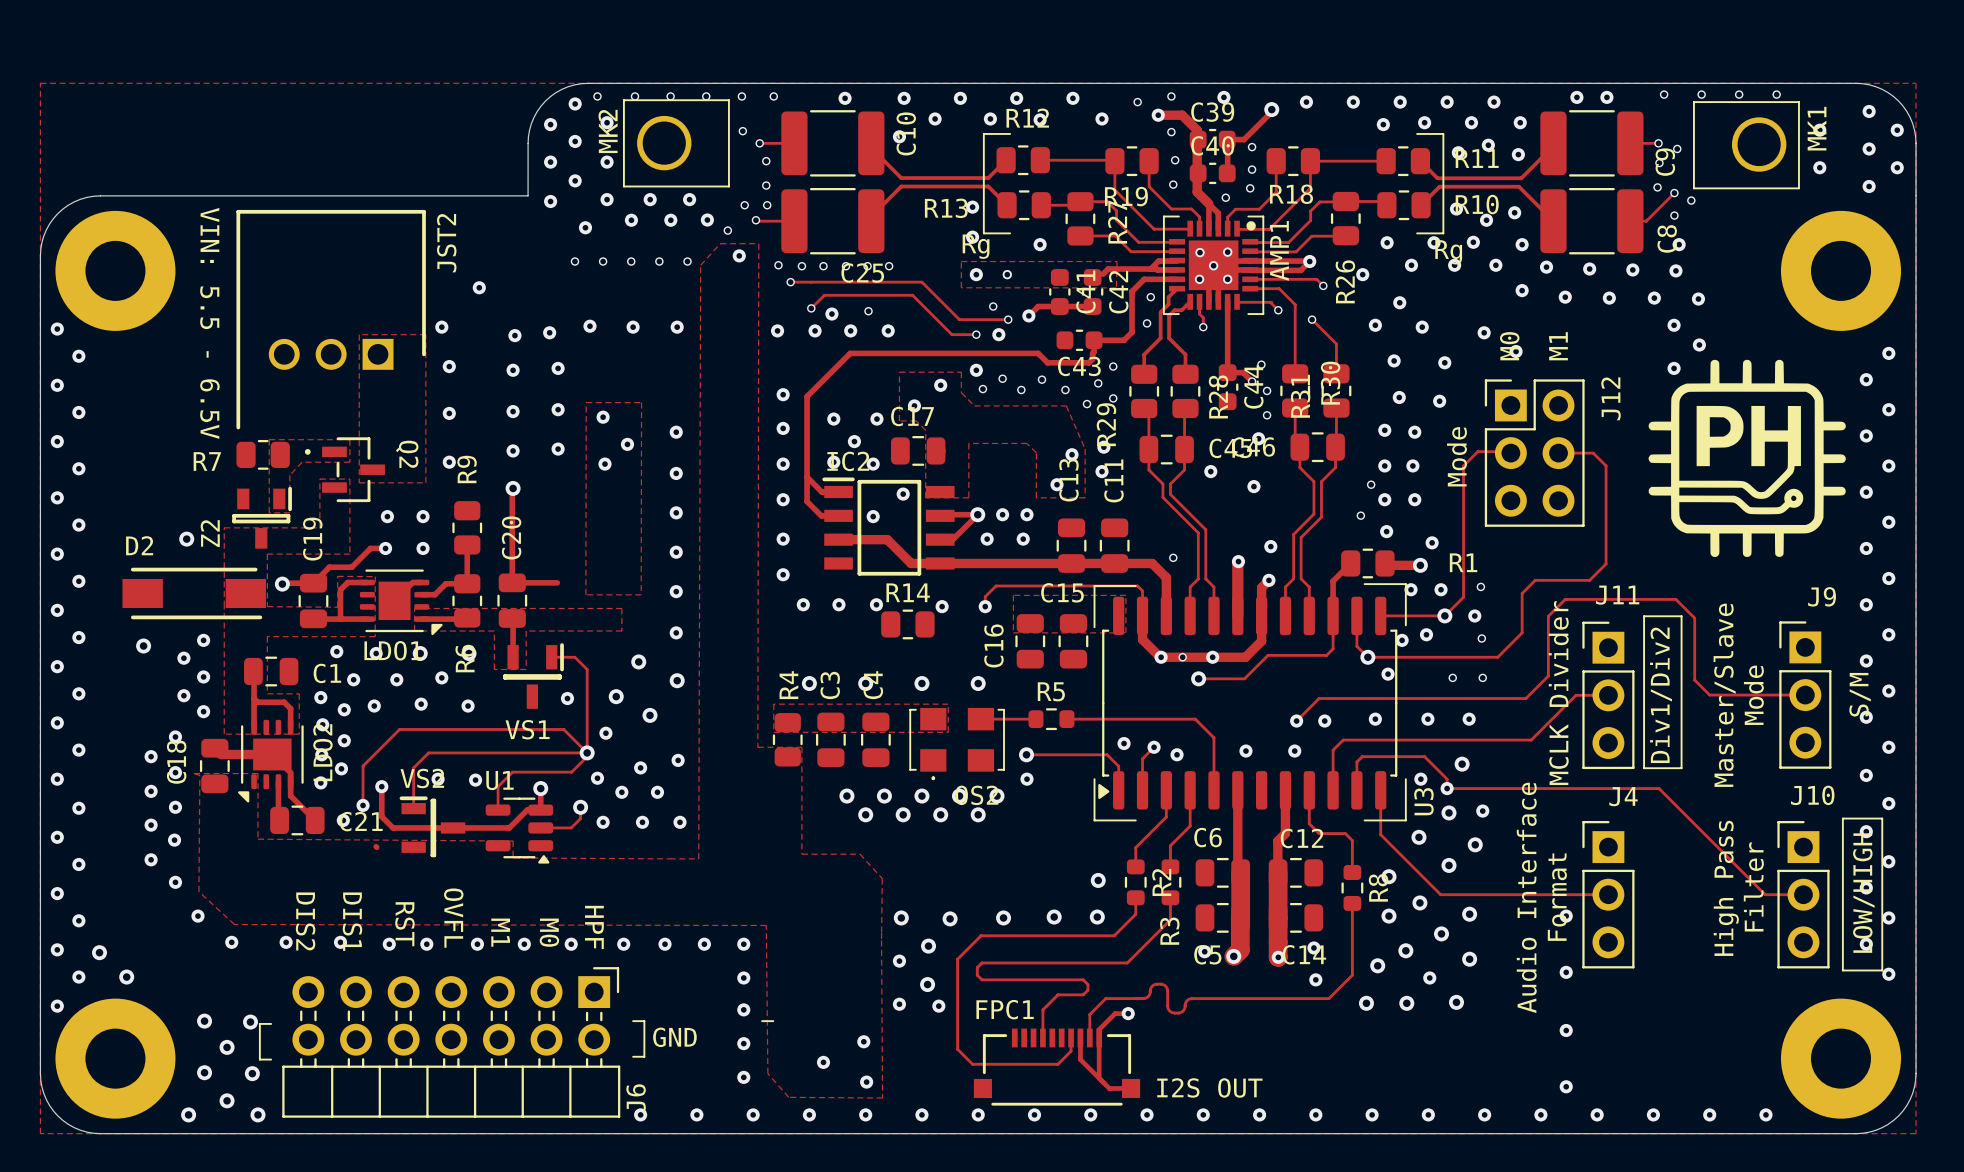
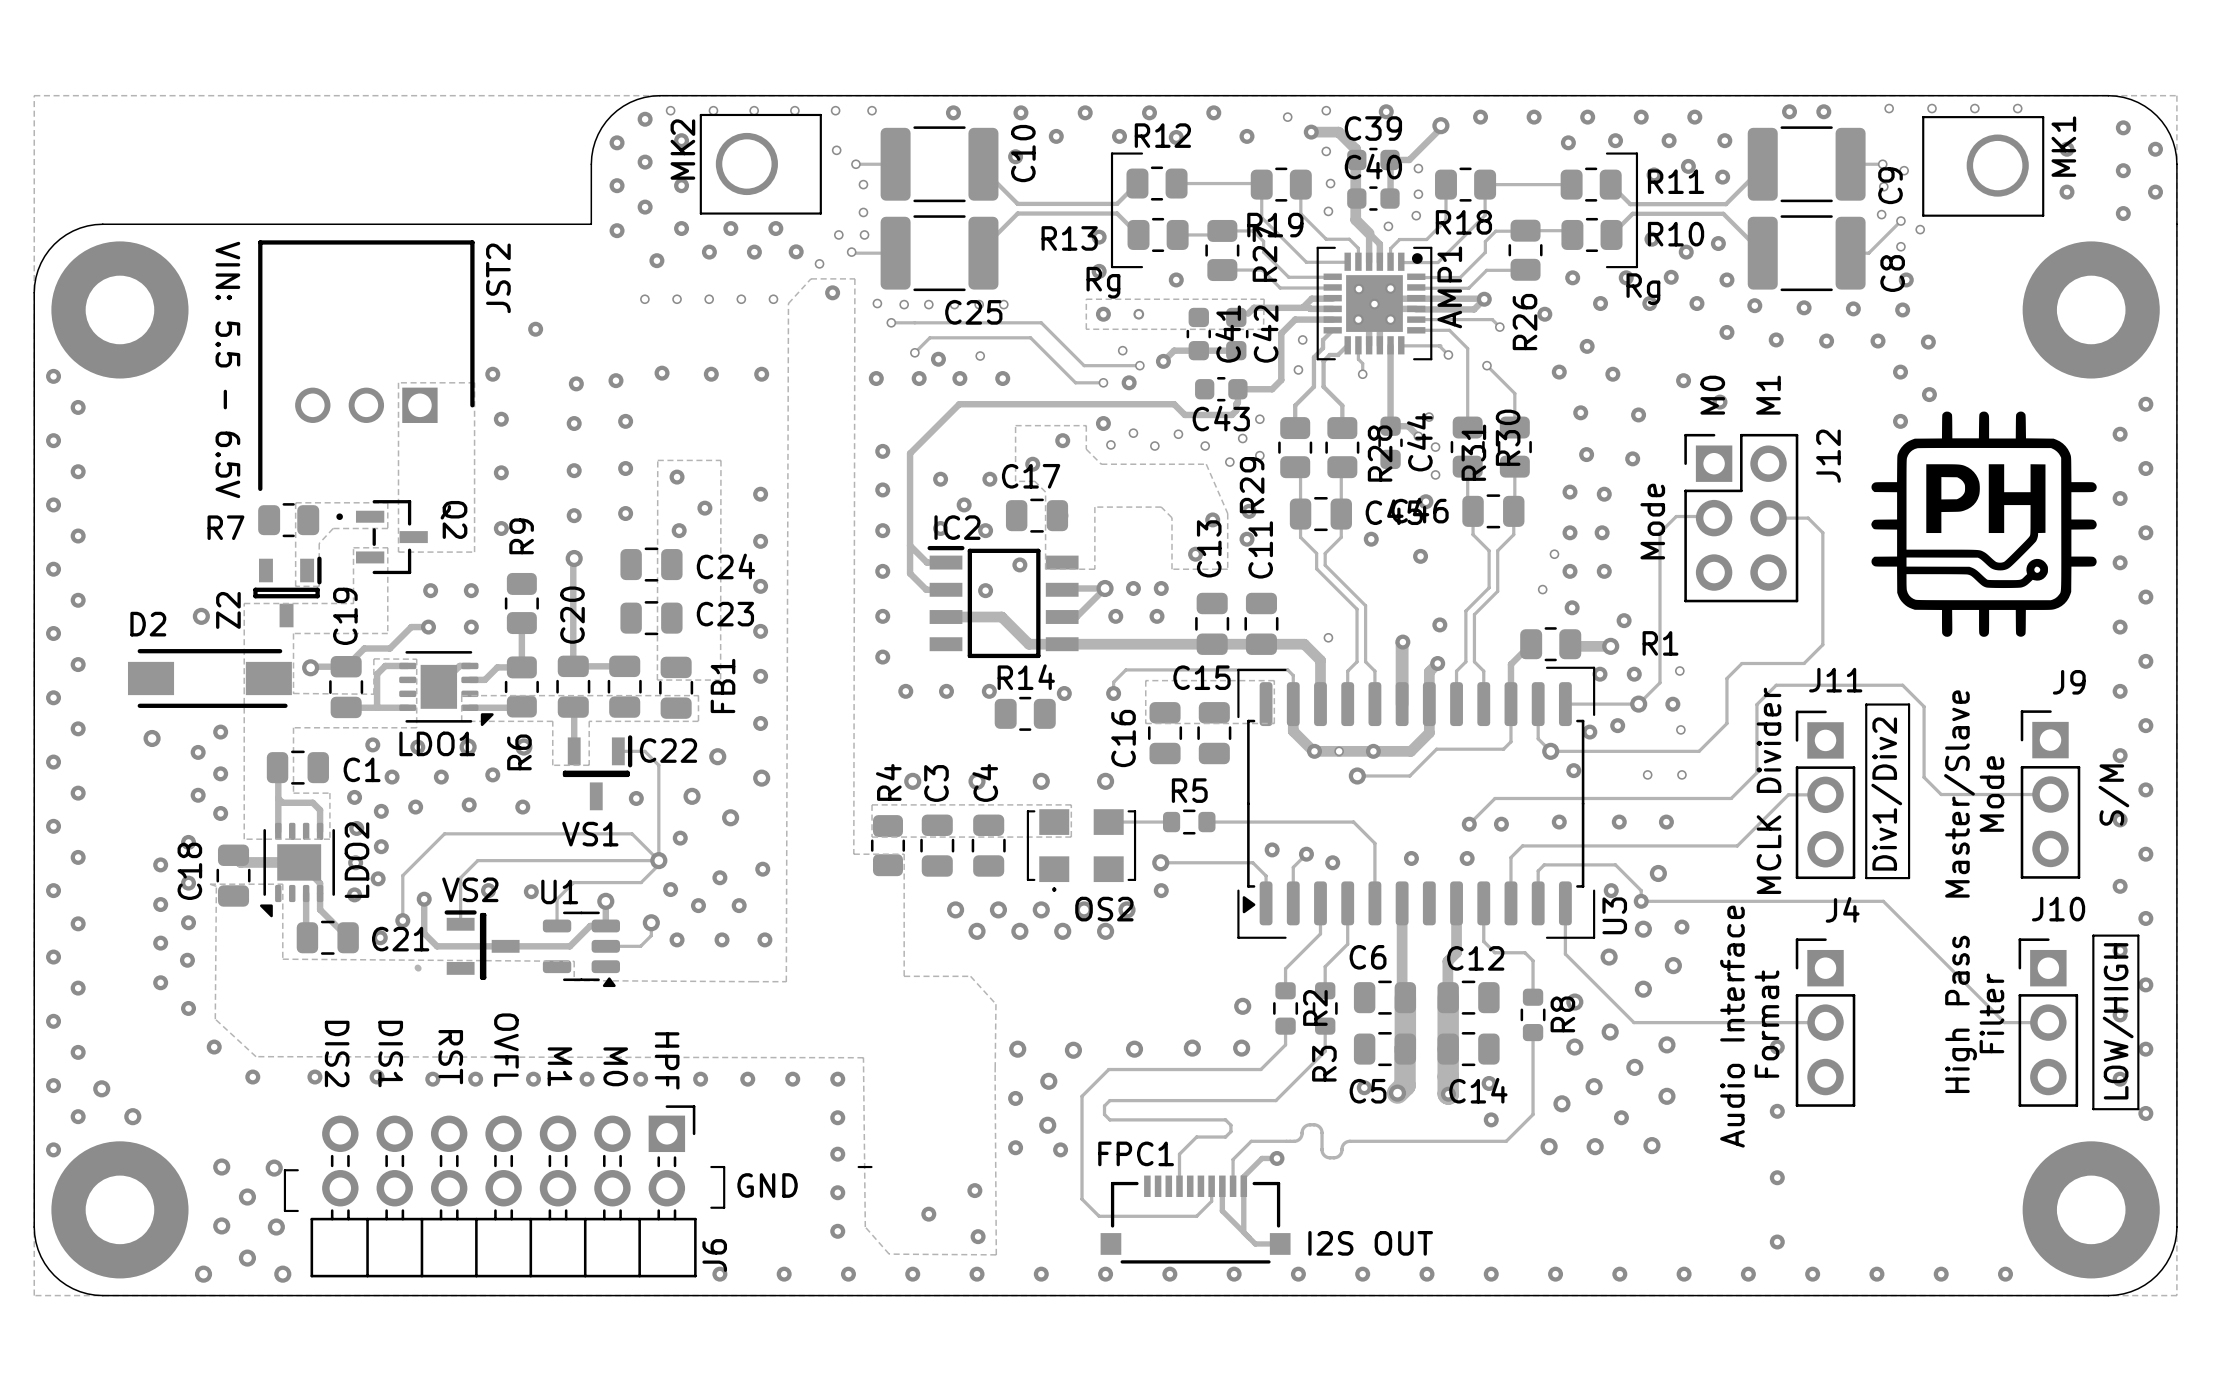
C24: none -> (651, 564)
C23: none -> (651, 618)
C22: none -> (624, 686)
FB1: none -> (676, 687)

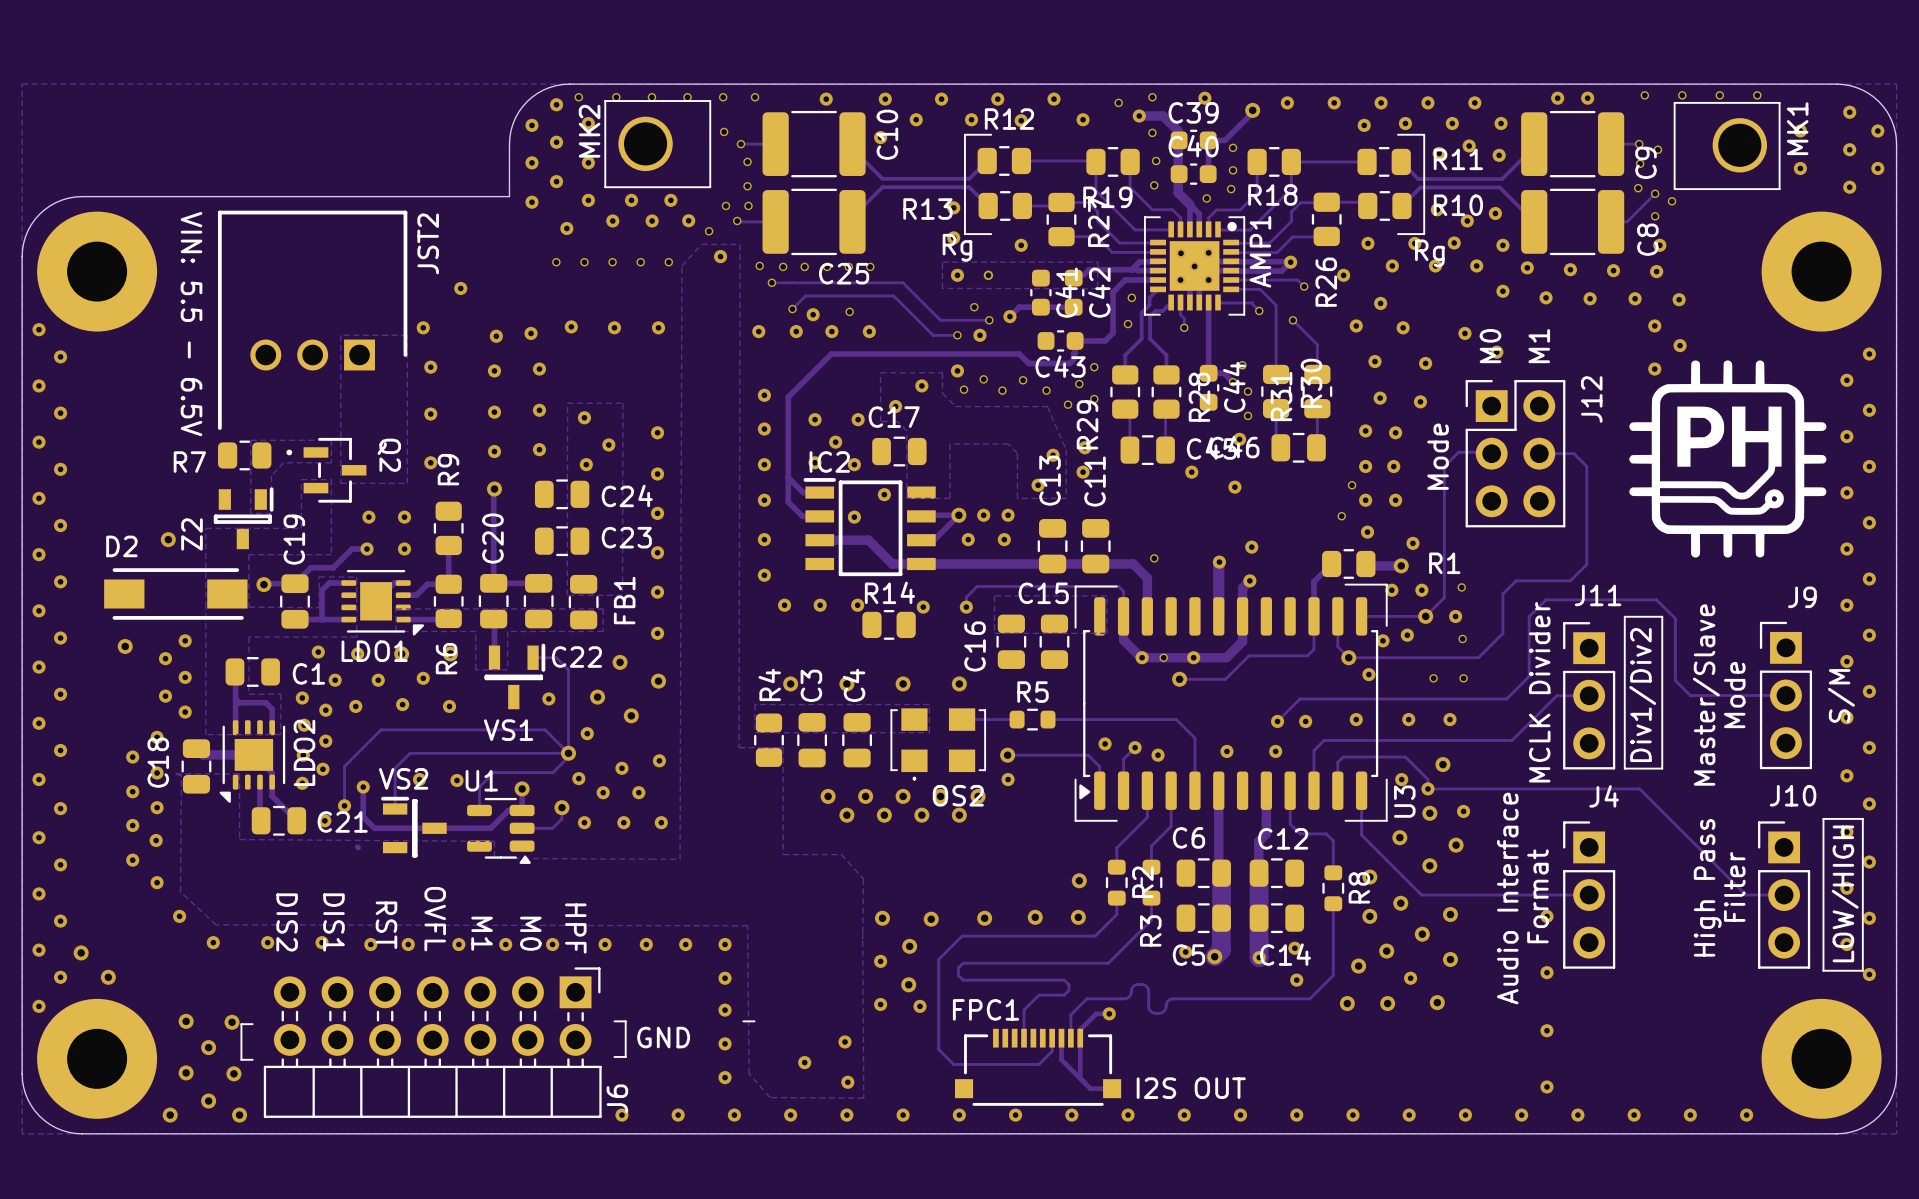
track: (1473, 511) (1473, 534) (1489, 550) (1489, 587) (1465, 611) (1465, 661) (1456, 671) (1456, 704) -> none
track: (1513, 511) (1513, 534) (1497, 550) (1497, 591) (1474, 614) (1474, 661) (1483, 671) (1483, 704) -> none
track: (1300, 514) (1300, 537) (1316, 553) (1316, 568) (1357, 609) (1357, 661) (1347, 671) (1347, 704) -> none
track: (1341, 514) (1341, 537) (1325, 553) (1325, 565) (1365, 605) (1365, 661) (1374, 671) (1374, 704) -> none

